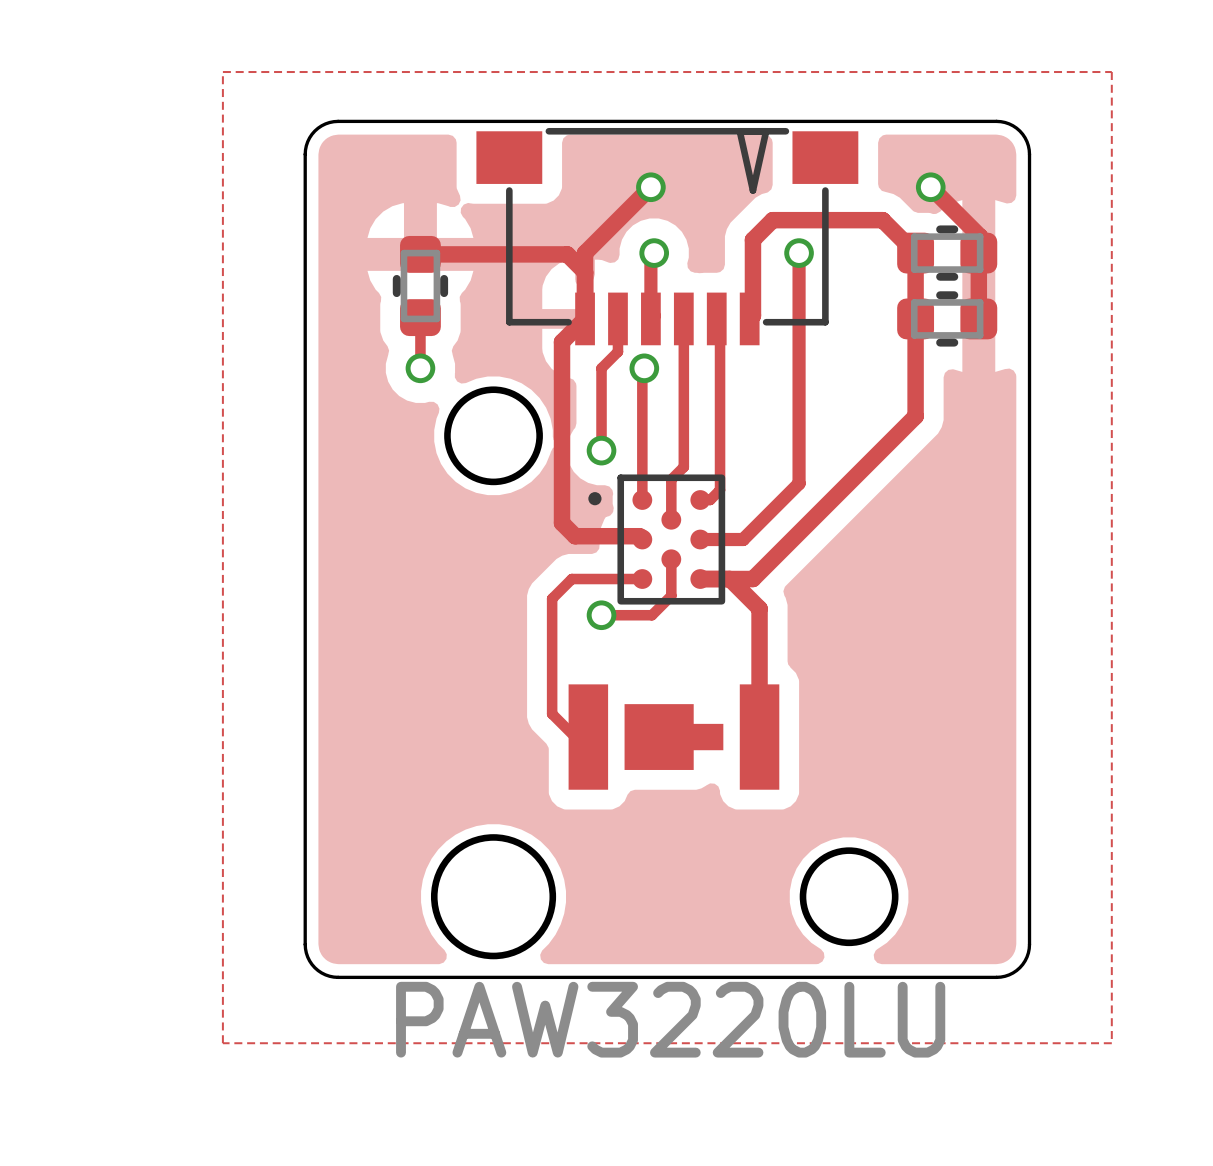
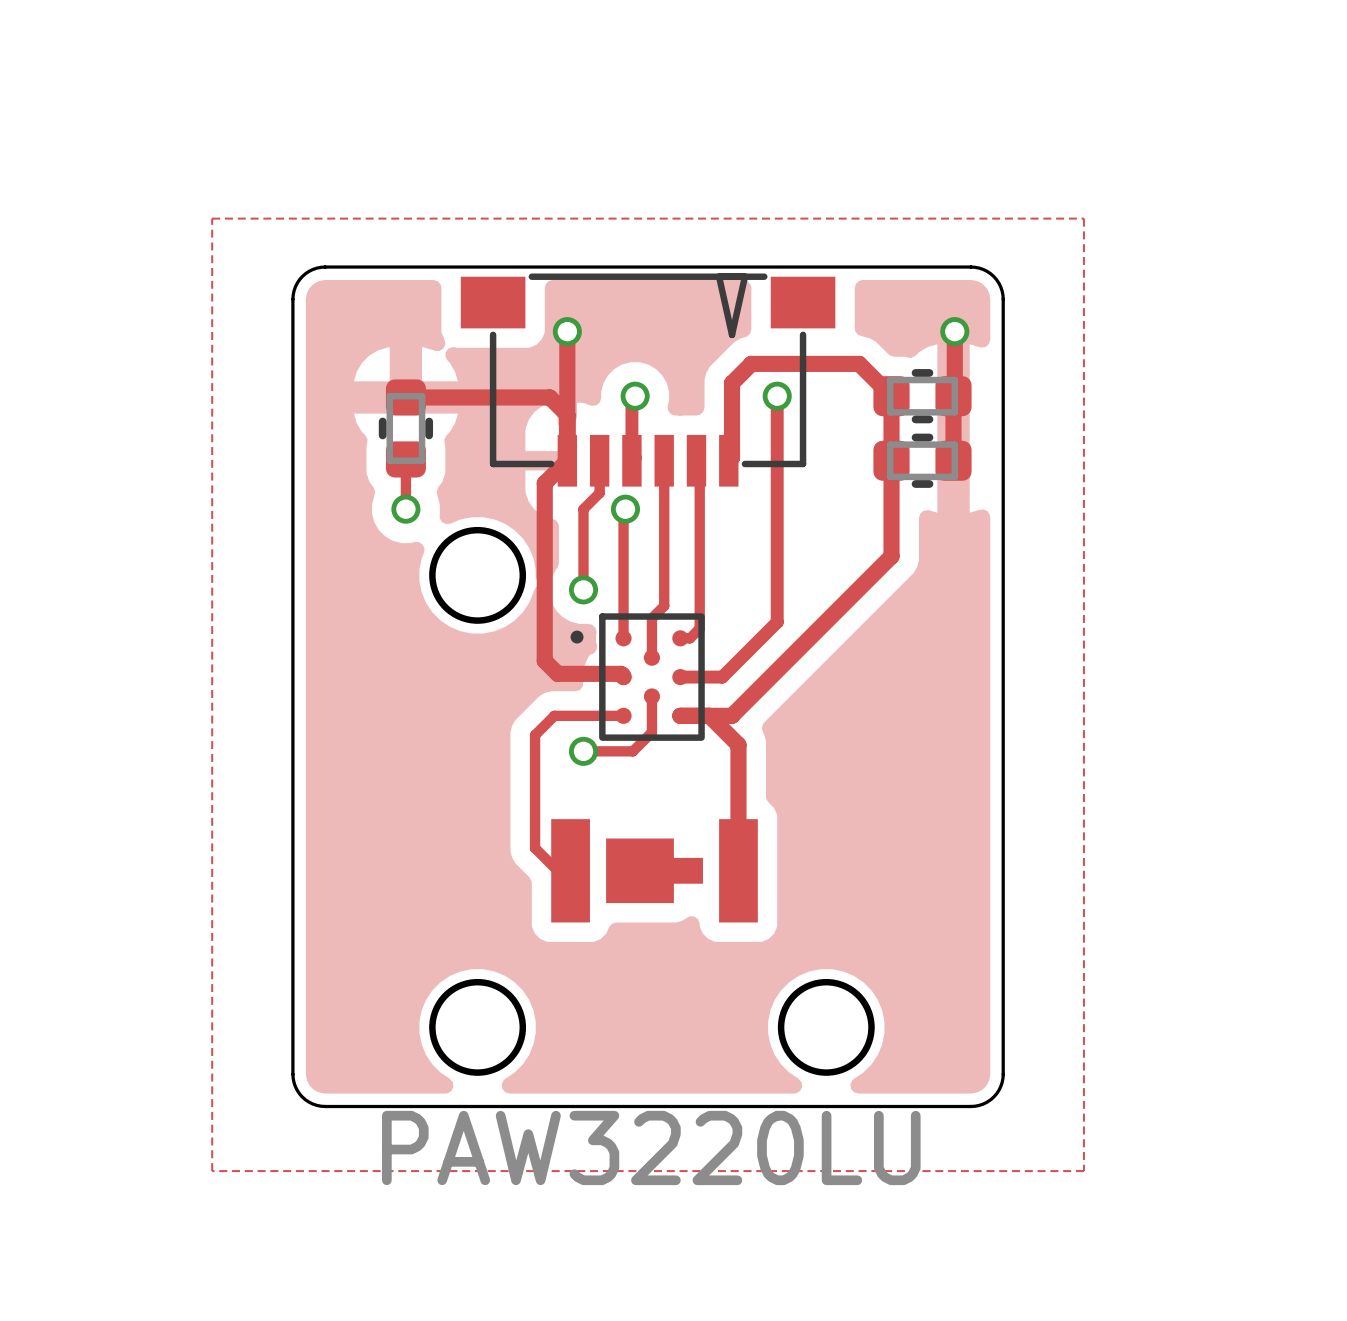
track: (650, 187) (585, 253) -> (567, 331) (567, 396)
via position: (650, 187) -> (567, 331)
track: (930, 187) (980, 236) -> (954, 331) (954, 380)
via position: (930, 187) -> (954, 331)
part footprint: [430, 386, 899, 960] -> [429, 526, 875, 1076]

